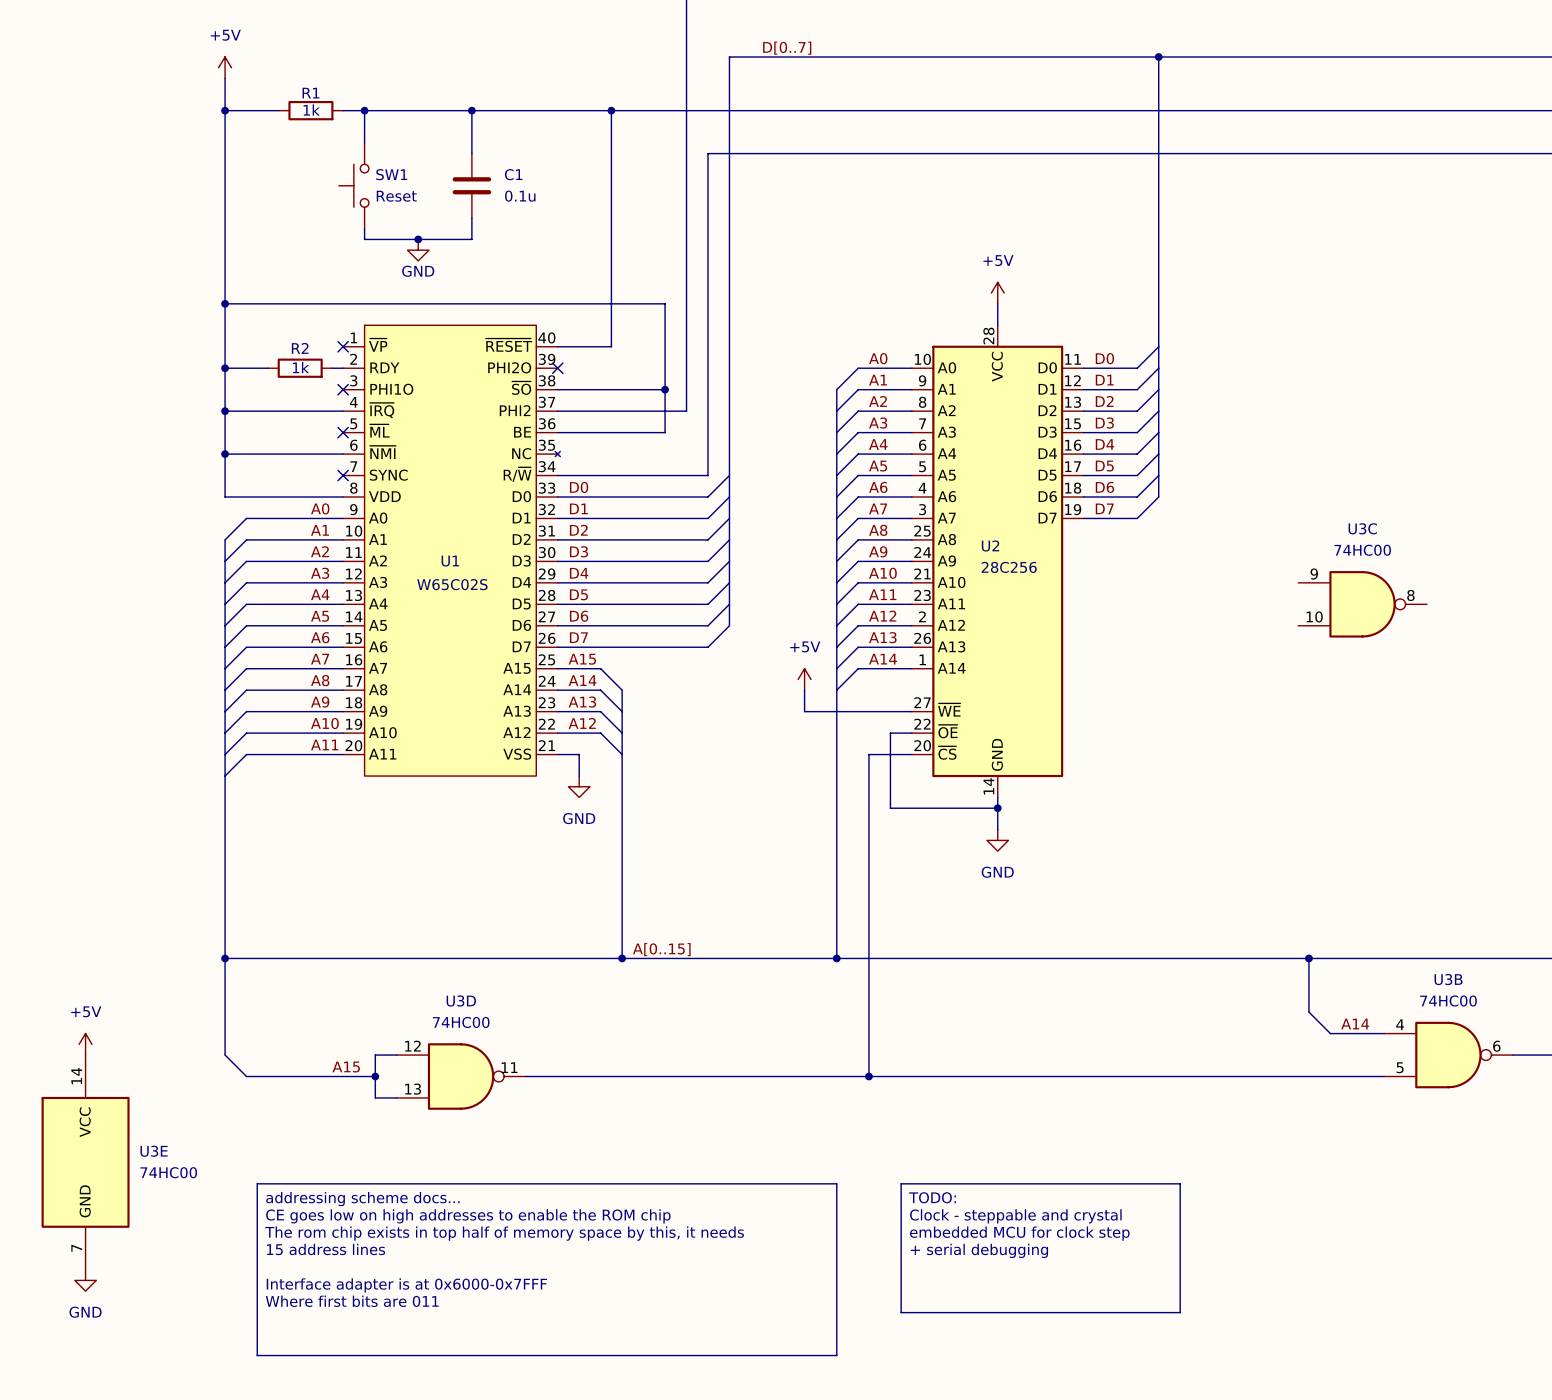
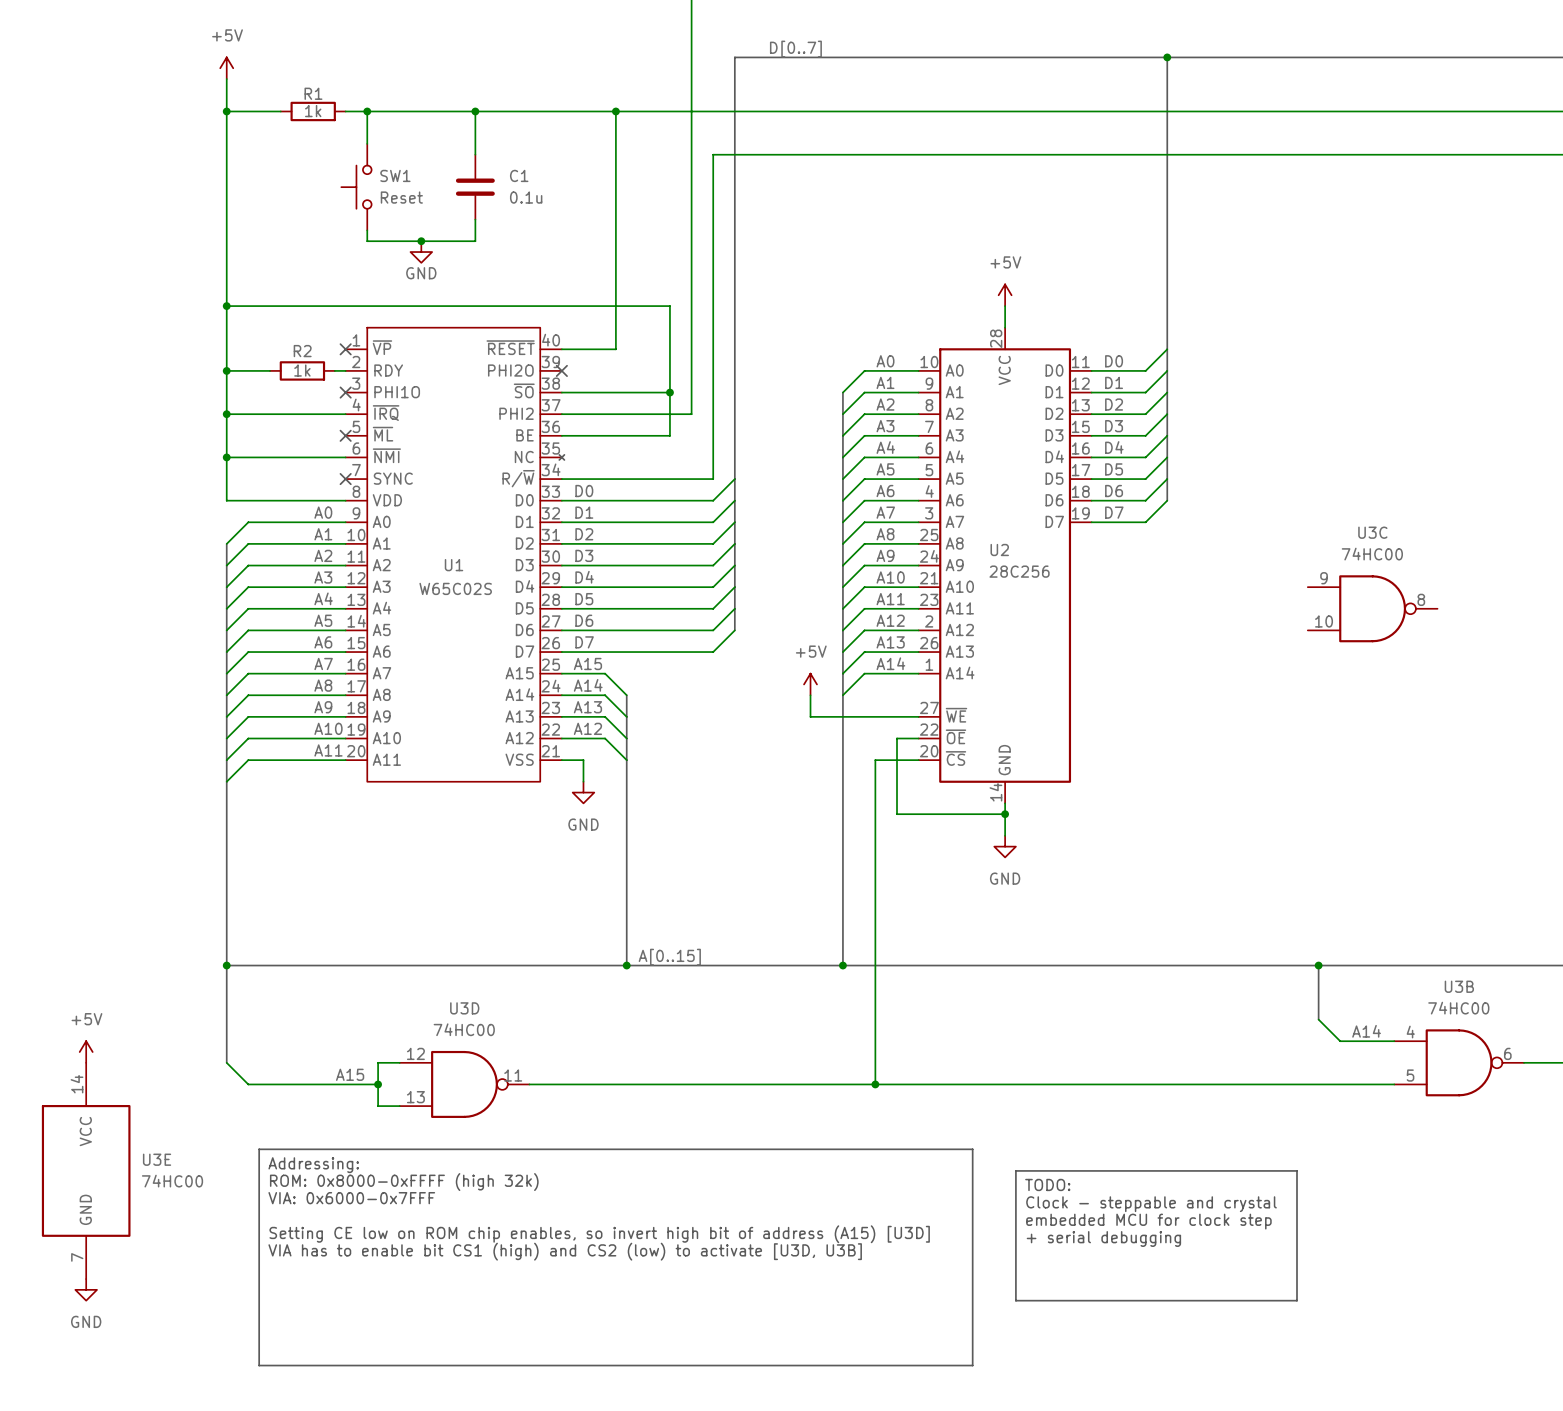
text: none -> Addressing: (313, 1165)
text: none -> ROM: 0x8000-0xFFFF (high 32k) (404, 1182)
line: (257, 1183) (836, 1183) (836, 1355) -> (259, 1192) (259, 1149) (972, 1149) (972, 1365) (842, 1365)
line: (901, 1183) (1180, 1183) (1180, 1312) (901, 1312) (901, 1183) -> (1015, 1170) (1297, 1170) (1297, 1300) (1015, 1300) (1015, 1170)
text position: TODO: (932, 1197) -> TODO: (1047, 1184)
text: addressing scheme docs... (362, 1199) -> VIA: 0x6000-0x7FFF (351, 1198)
text: CE goes low on high addresses to enable the ROM chip (468, 1216) -> none
text position: Clock - steppable and crystal (1015, 1216) -> Clock - steppable and crystal (1151, 1204)
text: none -> Setting CE low on ROM chip enables, so invert high bit of address (A15) [U3D] (599, 1234)
text: The rom chip exists in top half of memory space by this, it needs (504, 1233) -> none
text position: embedded MCU for clock step (1019, 1233) -> embedded MCU for clock step (1148, 1221)
text: none -> VIA has to enable bit CS1 (high) and CS2 (low) to activate [U3D, U3B] (565, 1251)
text: 15 address lines (326, 1249) -> none
text position: + serial debugging (979, 1250) -> + serial debugging (1103, 1238)
text: Interface adapter is at 0x6000-0x7FFF (406, 1285) -> none
text: Where first bits are 011 (352, 1301) -> none

